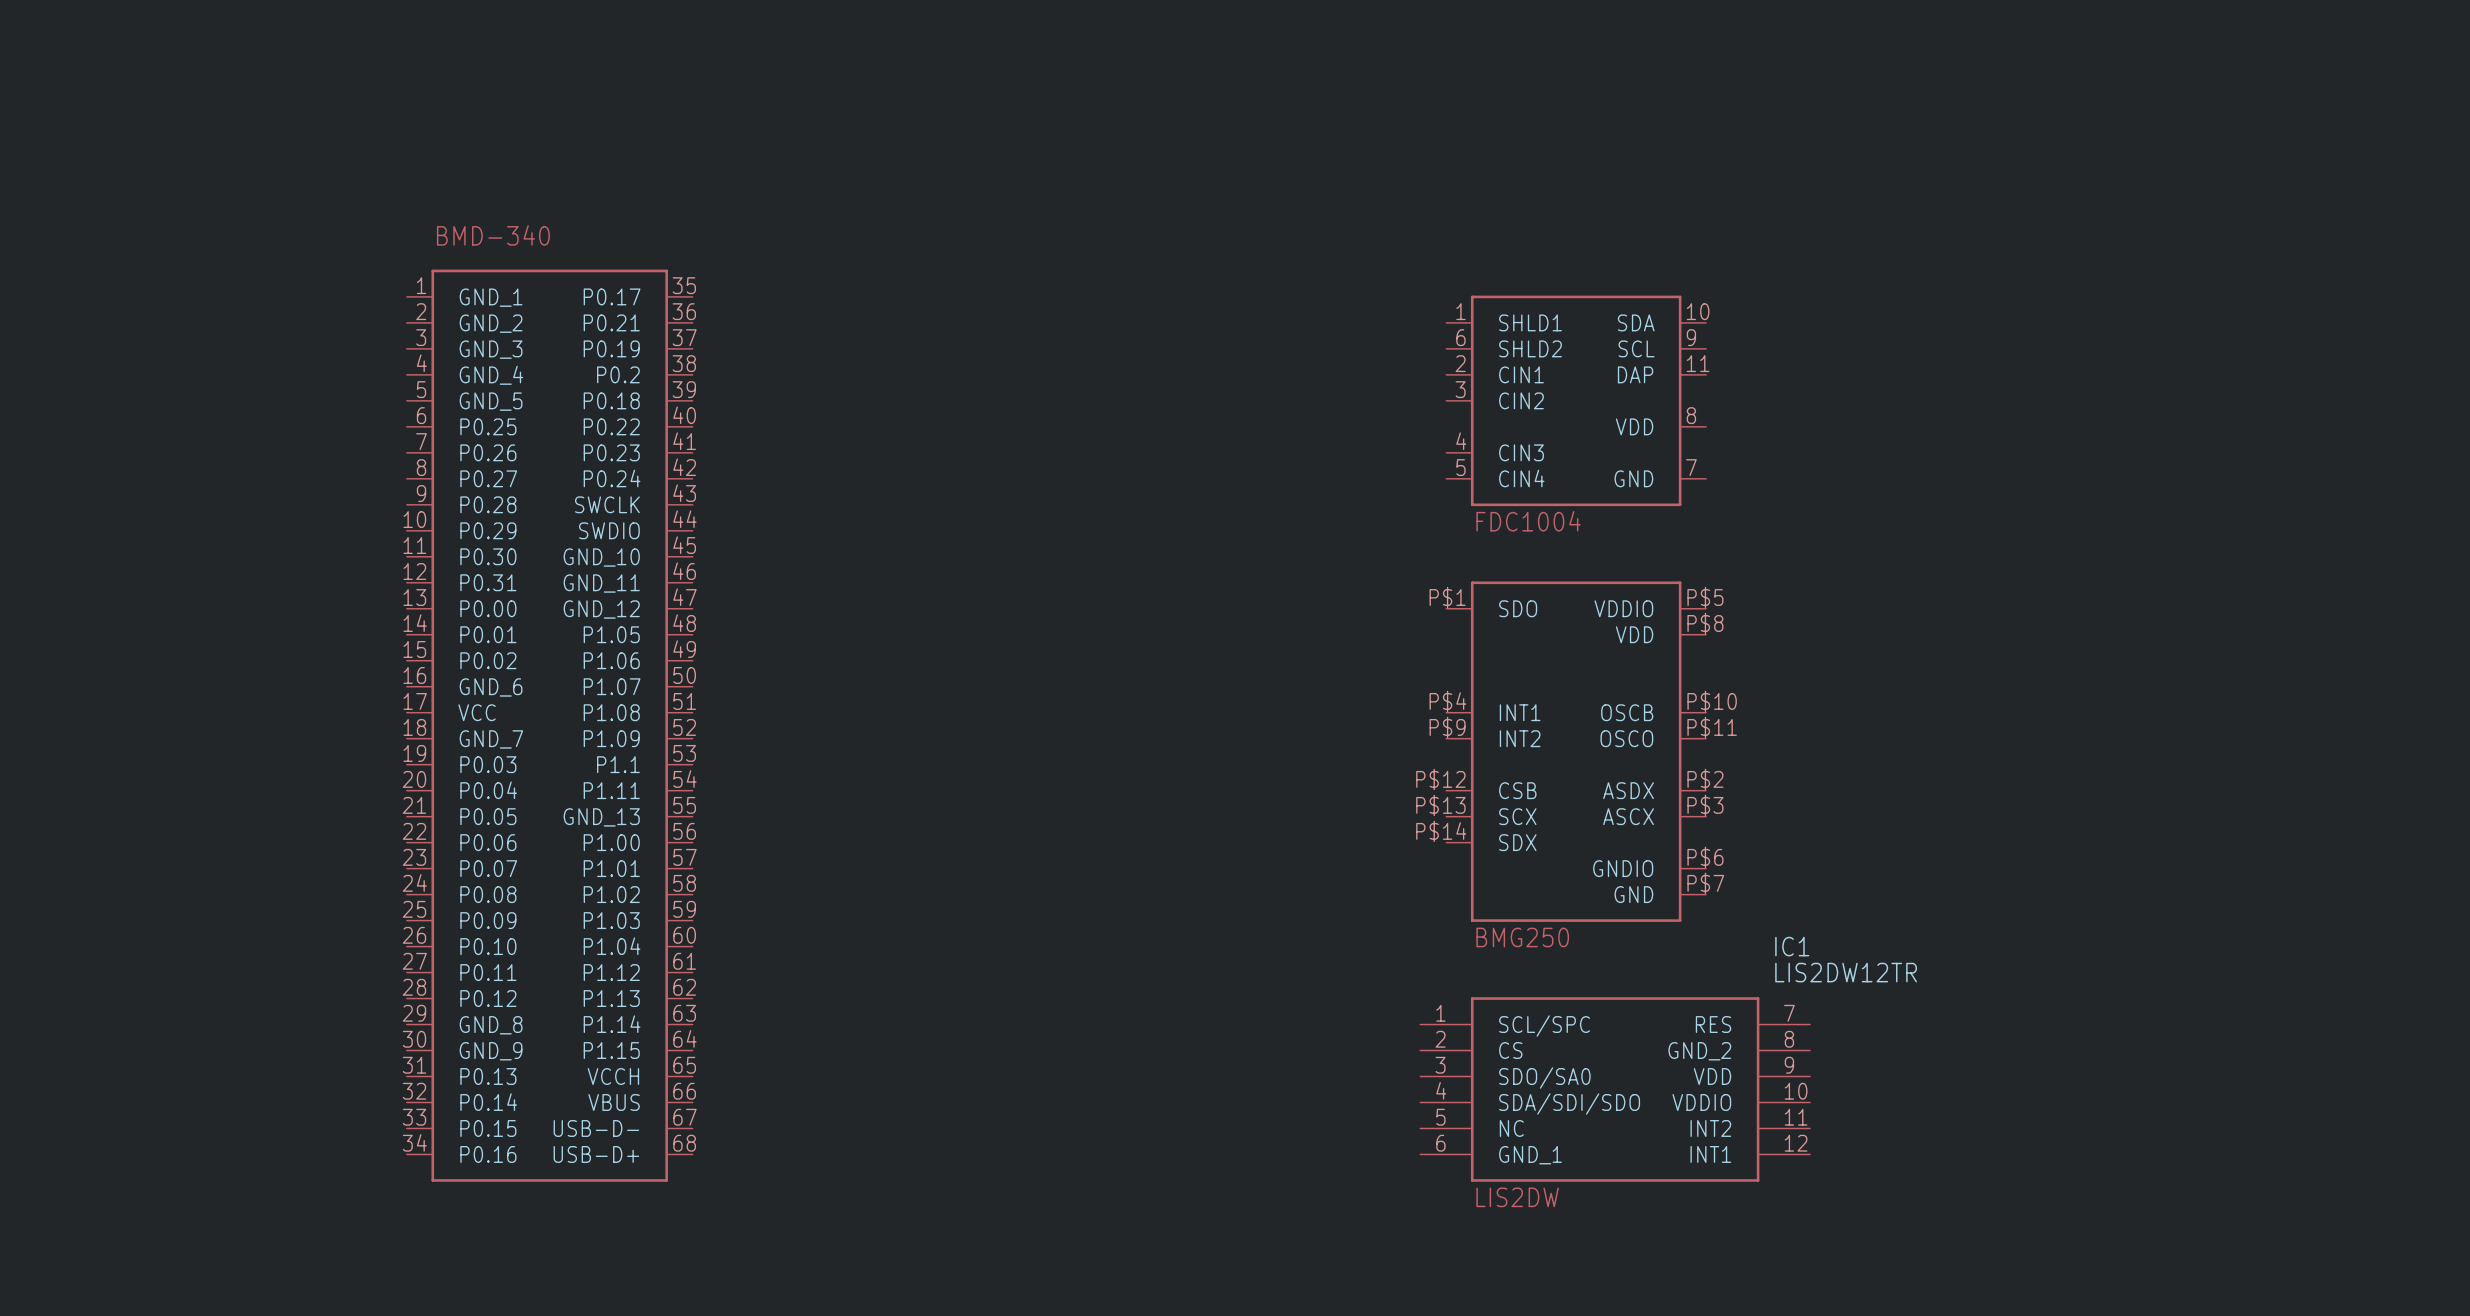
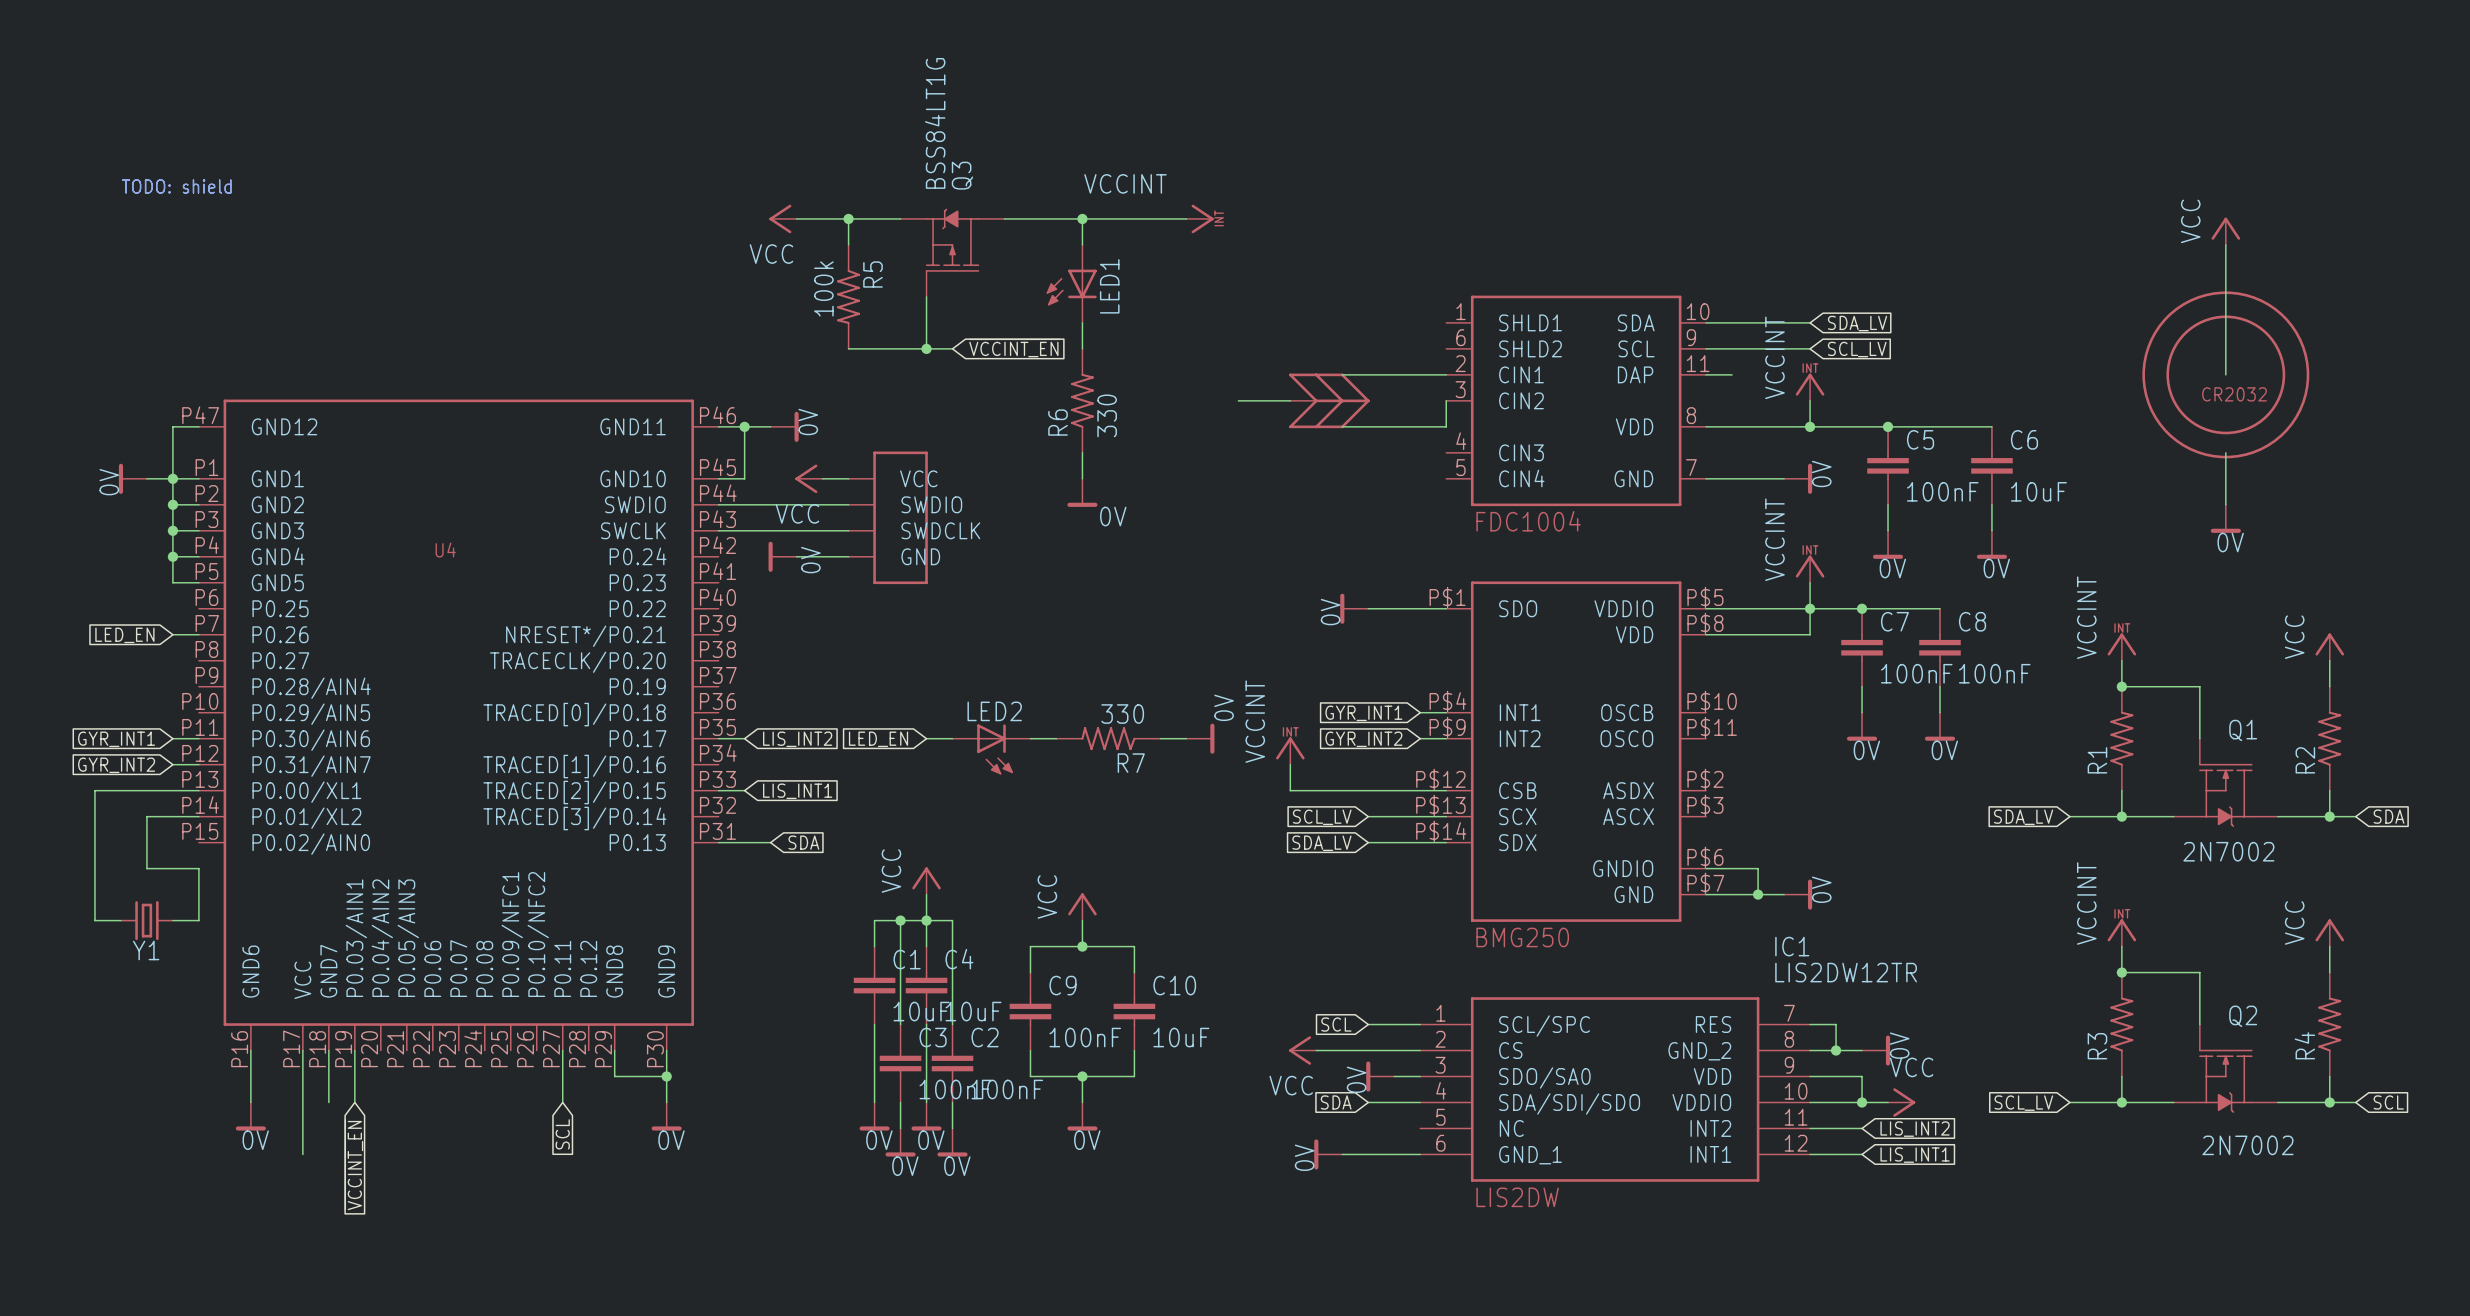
text: none -> TODO: shield (176, 186)
power symbol: none -> VCC (782, 218)
wire: none -> (796, 218) (900, 218)
wire: none -> (848, 218) (848, 244)
junction: none -> (848, 218)
wire: none -> (1004, 218) (1186, 218)
wire: none -> (1082, 218) (1082, 244)
junction: none -> (1082, 218)
power symbol: none -> VCCINT (1200, 218)
power symbol: none -> VCC (2225, 231)
wire: none -> (2225, 244) (2225, 374)
Q3: none -> BSS84LT1G (952, 252)
LED1: none -> (1071, 283)
R5: none -> 100k (848, 296)
wire: none -> (926, 296) (926, 348)
wire: none -> (1082, 322) (1082, 348)
wire: none -> (1706, 322) (1810, 322)
global label: none -> SDA_LV (1857, 323)
wire: none -> (848, 348) (952, 348)
junction: none -> (926, 348)
global label: none -> ~{VCCINT_EN} (1014, 348)
wire: none -> (1706, 348) (1810, 348)
global label: none -> SCL_LV (1857, 349)
wire: none -> (1342, 374) (1446, 374)
wire: none -> (1706, 374) (1732, 374)
part: none -> (2225, 374)
power symbol: none -> VCCINT (1810, 387)
R6: none -> 330 (1082, 400)
wire: none -> (1238, 400) (1290, 400)
part: none -> (1329, 400)
wire: none -> (1446, 400) (1446, 426) (1342, 426)
wire: none -> (1810, 400) (1810, 426)
wire: none -> (198, 426) (172, 426) (172, 582) (198, 582)
wire: none -> (718, 426) (770, 426)
wire: none -> (744, 426) (744, 478) (718, 478)
junction: none -> (744, 426)
power symbol: none -> 0V (784, 426)
wire: none -> (1706, 426) (1991, 426)
junction: none -> (1810, 426)
junction: none -> (1888, 426)
wire: none -> (1082, 452) (1082, 478)
wire: none -> (2225, 452) (2225, 504)
C5: none -> 100nF (1888, 465)
C6: none -> 10uF (1991, 465)
power symbol: none -> 0V (132, 478)
wire: none -> (146, 478) (198, 478)
junction: none -> (172, 478)
power symbol: none -> VCC (808, 478)
wire: none -> (822, 478) (848, 478)
wire: none -> (1706, 478) (1784, 478)
power symbol: none -> 0V (1798, 478)
power symbol: none -> 0V (1082, 492)
wire: none -> (172, 504) (198, 504)
junction: none -> (172, 504)
wire: none -> (718, 504) (848, 504)
wire: none -> (1888, 504) (1888, 530)
wire: none -> (1991, 504) (1991, 530)
part: none -> (888, 517)
power symbol: none -> 0V (2225, 518)
wire: none -> (172, 530) (198, 530)
junction: none -> (172, 530)
wire: none -> (718, 530) (848, 530)
power symbol: none -> 0V (1888, 544)
power symbol: none -> 0V (1991, 544)
wire: none -> (172, 556) (198, 556)
junction: none -> (172, 556)
power symbol: none -> 0V (782, 556)
wire: none -> (796, 556) (848, 556)
power symbol: none -> VCCINT (1810, 569)
wire: none -> (1810, 582) (1810, 634) (1706, 634)
power symbol: none -> 0V (1354, 608)
wire: none -> (1368, 608) (1446, 608)
wire: none -> (1706, 608) (1939, 608)
junction: none -> (1810, 608)
junction: none -> (1862, 608)
wire: none -> (172, 634) (198, 634)
global label: none -> LED_EN (124, 635)
C7: none -> 100nF (1862, 647)
C8: none -> 100nF (1939, 647)
power symbol: none -> VCCINT (2121, 647)
power symbol: none -> VCC (2329, 647)
wire: none -> (2121, 660) (2121, 686) (2199, 686) (2199, 738)
wire: none -> (2329, 660) (2329, 686)
wire: none -> (1862, 686) (1862, 712)
wire: none -> (1939, 686) (1939, 712)
junction: none -> (2121, 686)
wire: none -> (1420, 712) (1446, 712)
global label: none -> GYR_INT1 (1363, 713)
U4: none -> (458, 725)
part: (549, 725) -> none
power symbol: none -> 0V (1862, 726)
power symbol: none -> 0V (1939, 726)
wire: none -> (172, 738) (198, 738)
wire: none -> (718, 738) (744, 738)
wire: none -> (926, 738) (952, 738)
wire: none -> (1030, 738) (1056, 738)
R7: none -> 330 (1108, 738)
wire: none -> (1160, 738) (1186, 738)
power symbol: none -> 0V (1200, 738)
wire: none -> (1420, 738) (1446, 738)
R1: none -> (2121, 738)
R2: none -> (2329, 738)
global label: none -> GYR_INT1 (116, 739)
global label: none -> LIS_INT2 (797, 739)
global label: none -> LED_EN (878, 739)
global label: none -> GYR_INT2 (1363, 739)
LED2: none -> (991, 749)
power symbol: none -> VCCINT (1290, 751)
wire: none -> (172, 764) (198, 764)
wire: none -> (1290, 764) (1290, 790) (1446, 790)
global label: none -> GYR_INT2 (116, 765)
Q1: none -> 2N7002 (2225, 782)
wire: none -> (198, 790) (94, 790) (94, 920) (120, 920)
wire: none -> (718, 790) (744, 790)
wire: none -> (2121, 790) (2121, 816)
wire: none -> (2329, 790) (2329, 816)
global label: none -> LIS_INT1 (797, 791)
wire: none -> (198, 816) (146, 816) (146, 868) (198, 868) (198, 920) (172, 920)
wire: none -> (1368, 816) (1446, 816)
wire: none -> (2069, 816) (2173, 816)
junction: none -> (2121, 816)
wire: none -> (2277, 816) (2355, 816)
junction: none -> (2329, 816)
global label: none -> SDA (2389, 816)
global label: none -> SCL_LV (1322, 817)
global label: none -> SDA_LV (2023, 817)
wire: none -> (718, 842) (770, 842)
global label: none -> SDA (803, 842)
wire: none -> (1368, 842) (1446, 842)
global label: none -> SDA_LV (1321, 843)
wire: none -> (1706, 868) (1758, 868) (1758, 894)
power symbol: none -> VCC (926, 880)
wire: none -> (926, 894) (926, 946)
wire: none -> (1706, 894) (1784, 894)
junction: none -> (1758, 894)
power symbol: none -> 0V (1798, 894)
power symbol: none -> VCC (1082, 906)
Y1: none -> (146, 920)
wire: none -> (900, 920) (900, 1024)
junction: none -> (900, 920)
junction: none -> (926, 920)
wire: none -> (1082, 920) (1082, 946)
power symbol: none -> VCCINT (2121, 932)
power symbol: none -> VCC (2329, 932)
wire: none -> (874, 946) (874, 920) (952, 920) (952, 1024)
junction: none -> (1082, 946)
wire: none -> (2121, 946) (2121, 972) (2199, 972) (2199, 1024)
wire: none -> (2329, 946) (2329, 972)
wire: none -> (1030, 972) (1030, 946) (1134, 946) (1134, 972)
junction: none -> (2121, 972)
C1: none -> 10uF (874, 985)
C4: none -> 10uF (926, 985)
C9: none -> 100nF (1030, 1011)
C10: none -> 10uF (1134, 1011)
wire: none -> (874, 1024) (874, 1102)
wire: none -> (926, 1024) (926, 1102)
global label: none -> SCL (1336, 1024)
wire: none -> (1368, 1024) (1420, 1024)
wire: none -> (1810, 1024) (1836, 1024) (1836, 1050)
R3: none -> (2121, 1024)
R4: none -> (2329, 1024)
wire: none -> (250, 1050) (250, 1102)
wire: none -> (302, 1050) (302, 1154)
wire: none -> (328, 1050) (328, 1102)
wire: none -> (354, 1050) (354, 1102)
wire: none -> (562, 1050) (562, 1102)
wire: none -> (614, 1050) (614, 1076) (666, 1076)
wire: none -> (1030, 1050) (1030, 1076) (1134, 1076) (1134, 1050)
power symbol: none -> VCC (1302, 1050)
wire: none -> (1316, 1050) (1420, 1050)
wire: none -> (1810, 1050) (1862, 1050)
junction: none -> (1836, 1050)
power symbol: none -> 0V (1876, 1050)
C3: none -> 100nF (900, 1063)
C2: none -> 100nF (952, 1063)
Q2: none -> 2N7002 (2225, 1068)
junction: none -> (666, 1076)
wire: none -> (1082, 1076) (1082, 1102)
junction: none -> (1082, 1076)
power symbol: none -> 0V (1380, 1076)
wire: none -> (1394, 1076) (1420, 1076)
wire: none -> (1810, 1076) (1862, 1076) (1862, 1102)
wire: none -> (2121, 1076) (2121, 1102)
wire: none -> (2329, 1076) (2329, 1102)
wire: none -> (900, 1102) (900, 1128)
wire: none -> (952, 1102) (952, 1128)
global label: none -> SDA (1336, 1102)
wire: none -> (1368, 1102) (1420, 1102)
wire: none -> (1810, 1102) (1888, 1102)
junction: none -> (1862, 1102)
power symbol: none -> VCC (1901, 1102)
wire: none -> (2069, 1102) (2173, 1102)
junction: none -> (2121, 1102)
wire: none -> (2277, 1102) (2355, 1102)
junction: none -> (2329, 1102)
global label: none -> SCL (2388, 1102)
global label: none -> SCL_LV (2023, 1103)
power symbol: none -> 0V (250, 1116)
power symbol: none -> 0V (666, 1116)
power symbol: none -> 0V (874, 1116)
power symbol: none -> 0V (926, 1116)
power symbol: none -> 0V (1082, 1116)
wire: none -> (1810, 1128) (1862, 1128)
global label: none -> LIS_INT2 (1915, 1129)
global label: none -> SCL (562, 1134)
power symbol: none -> 0V (900, 1142)
power symbol: none -> 0V (952, 1142)
power symbol: none -> 0V (1328, 1154)
wire: none -> (1342, 1154) (1420, 1154)
wire: none -> (1810, 1154) (1862, 1154)
global label: none -> LIS_INT1 (1915, 1155)
global label: none -> ~{VCCINT_EN} (353, 1164)

